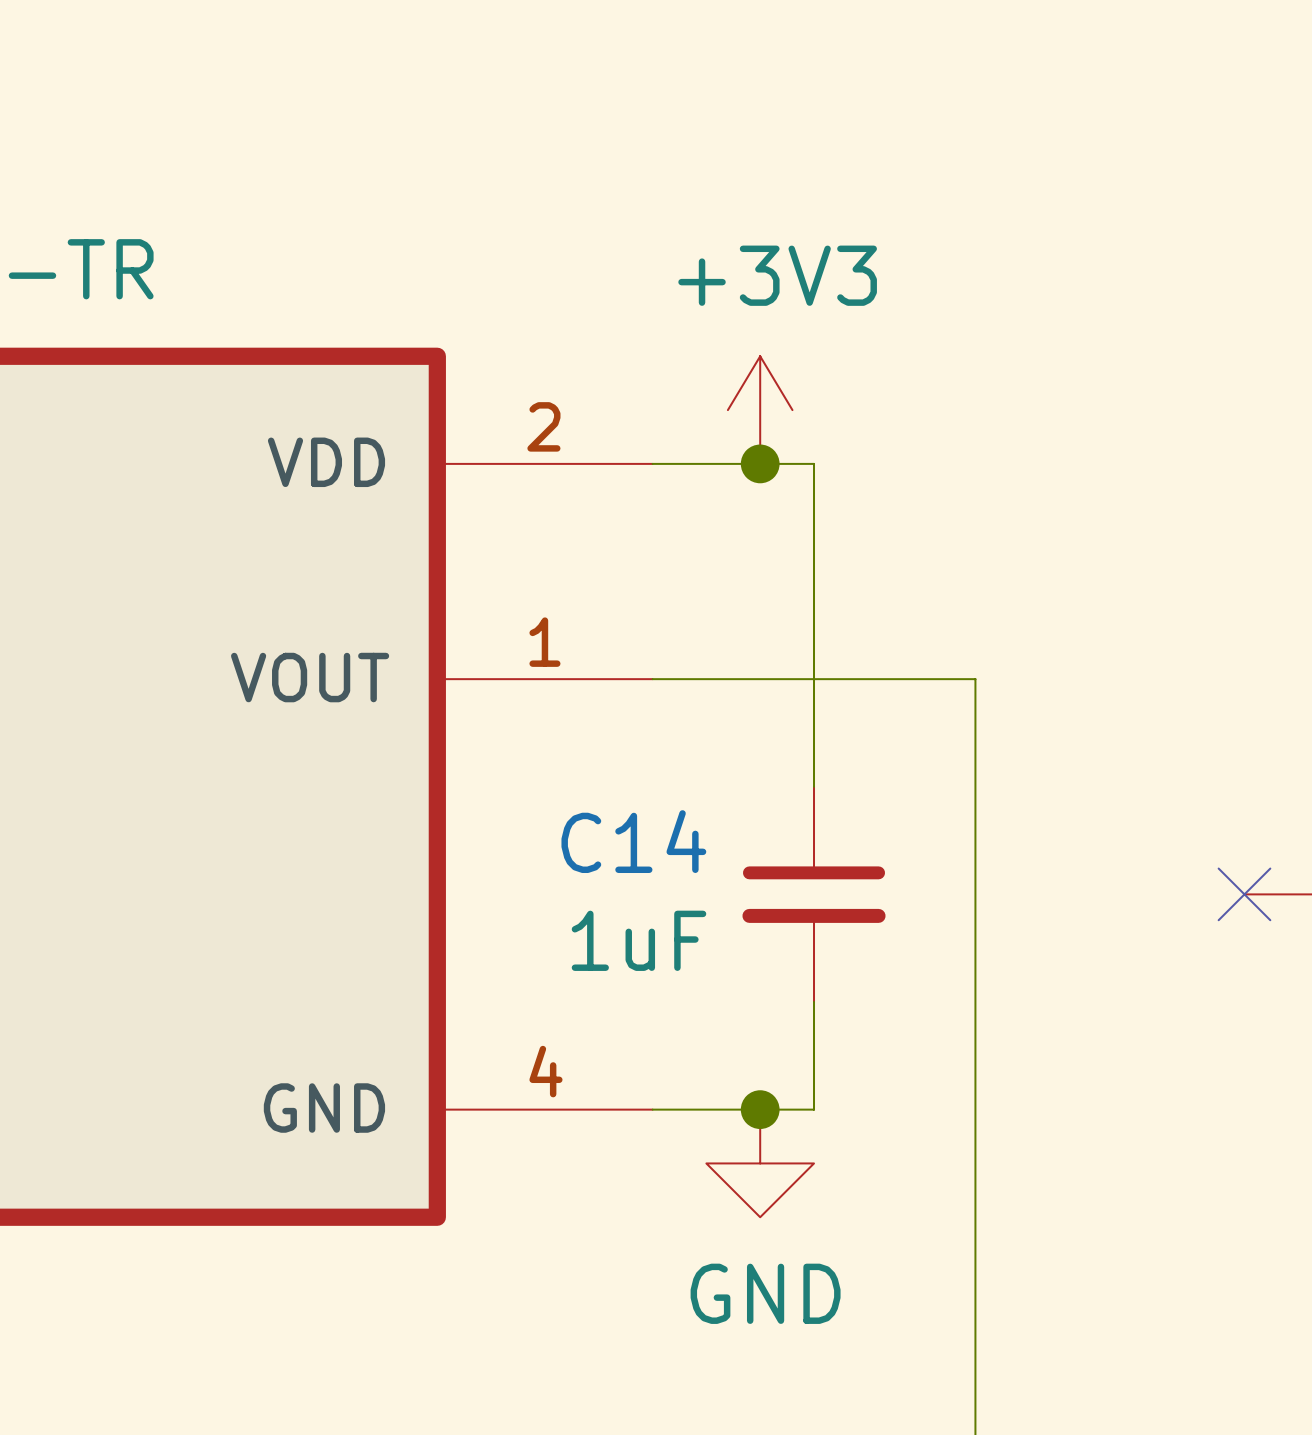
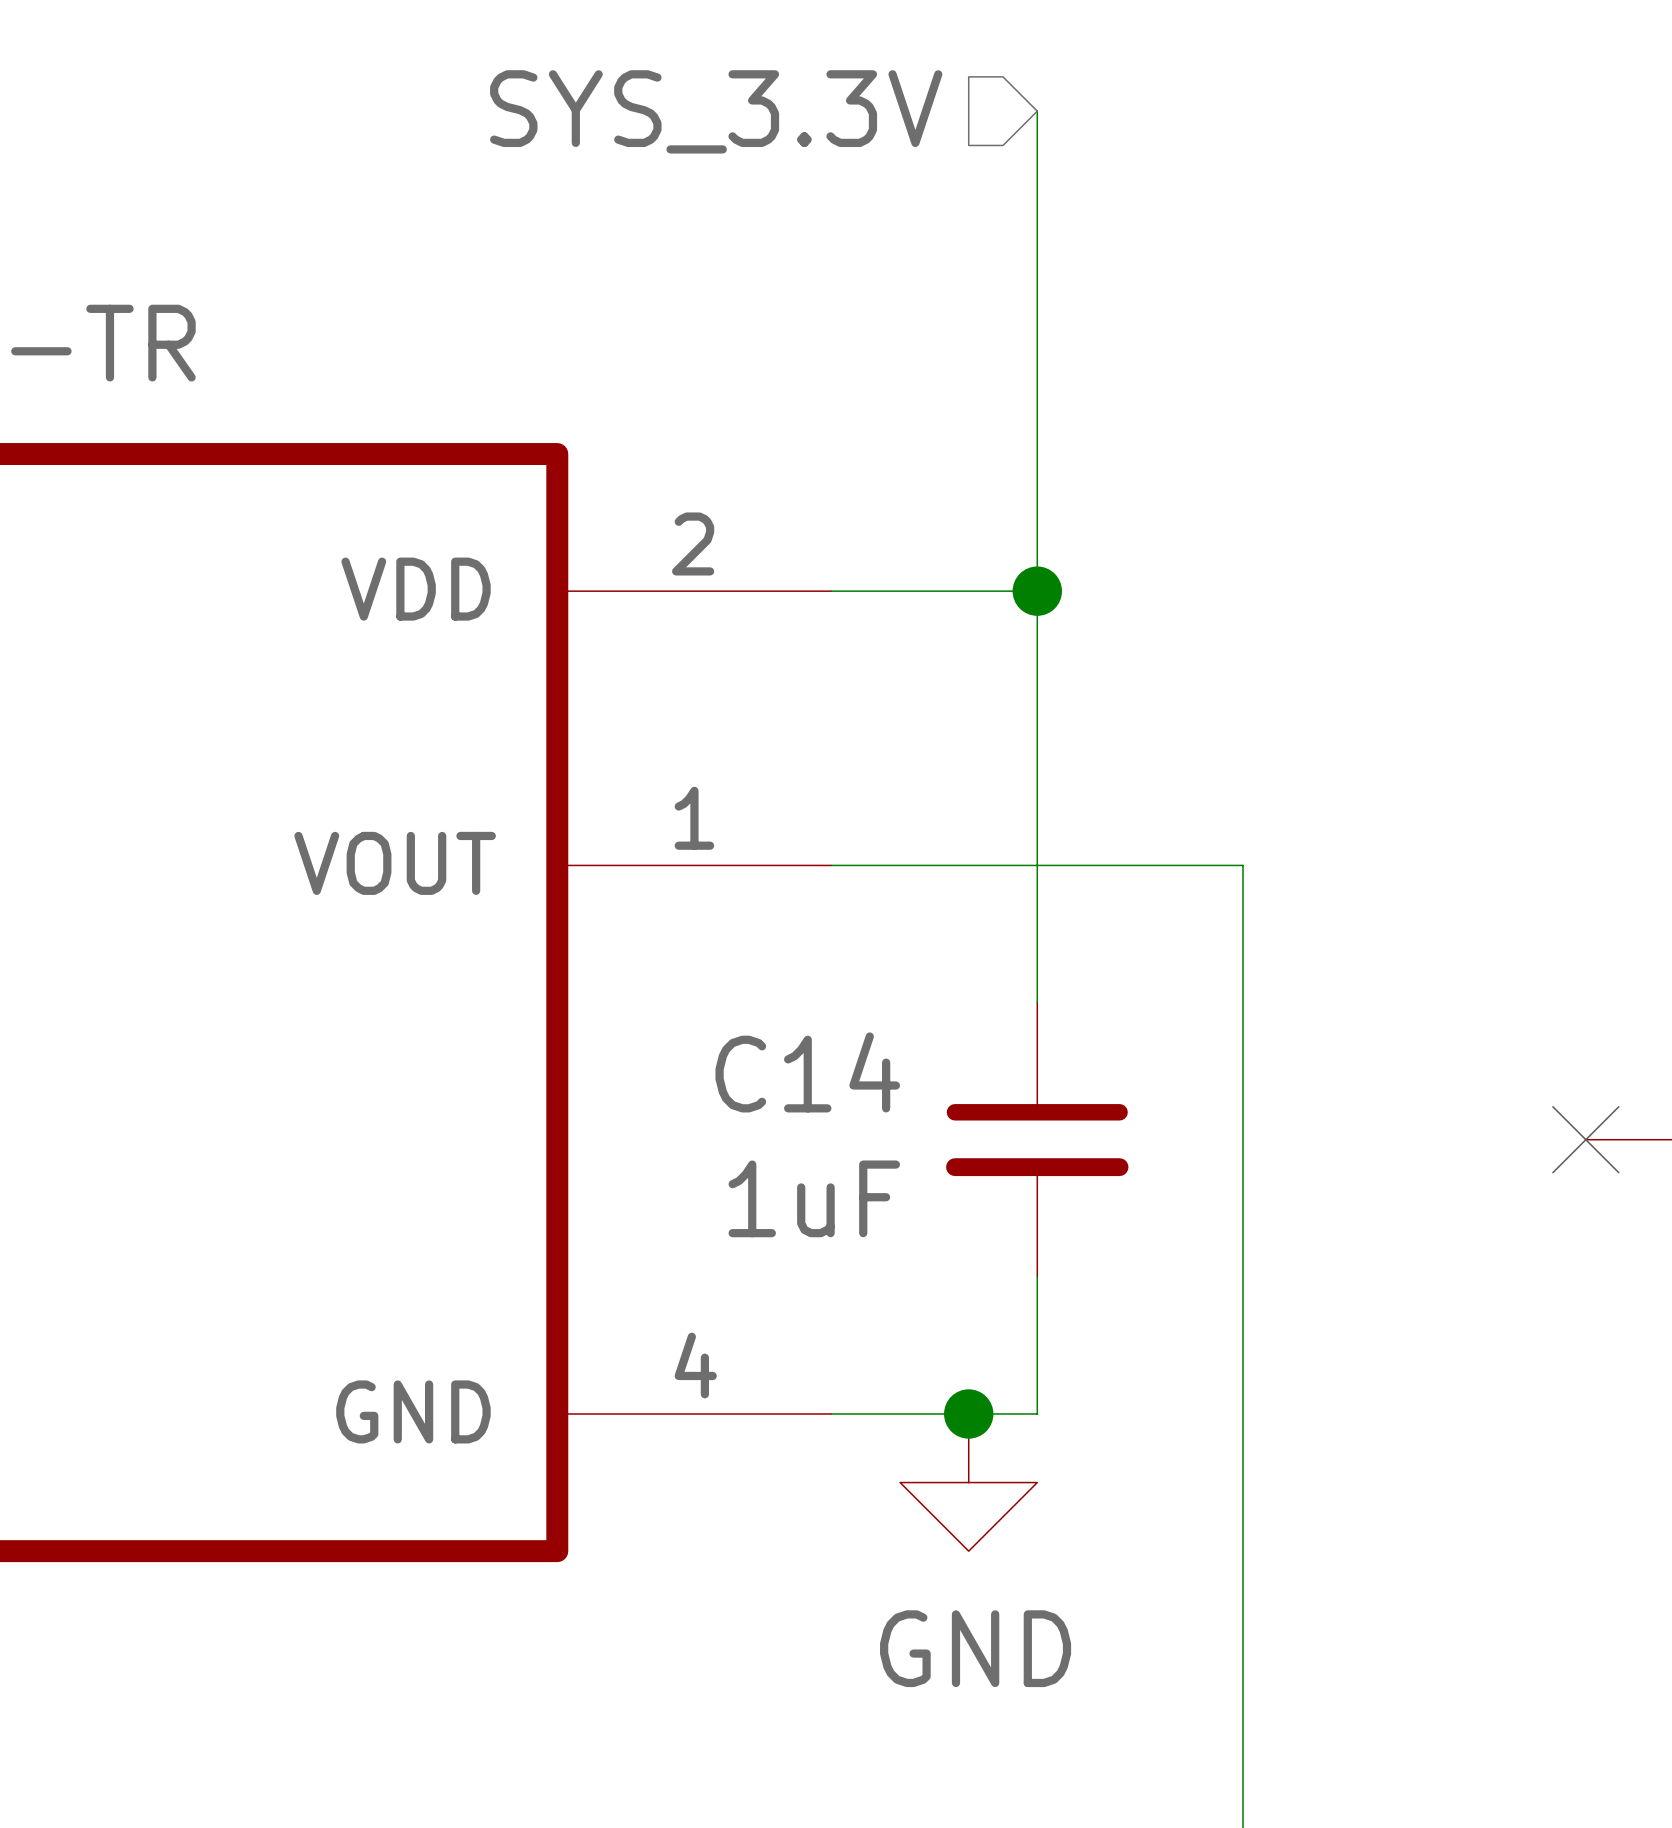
hierarchical label: none -> SYS_3.3V (716, 111)
wire: none -> (1037, 111) (1037, 591)
power symbol: +3V3 (760, 410) -> none
junction position: (760, 463) -> (1037, 591)

